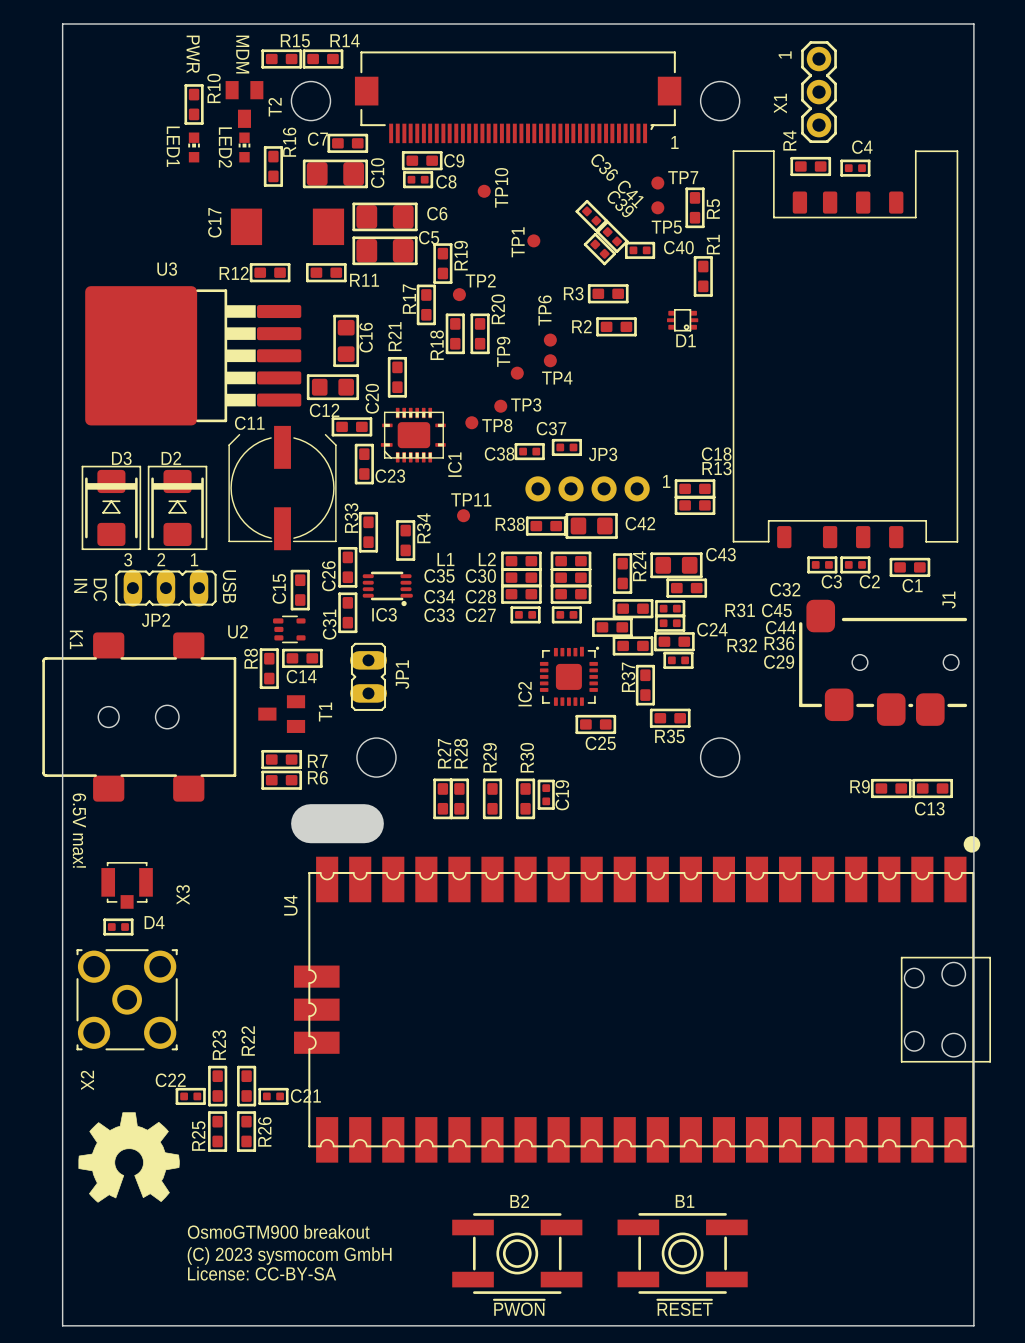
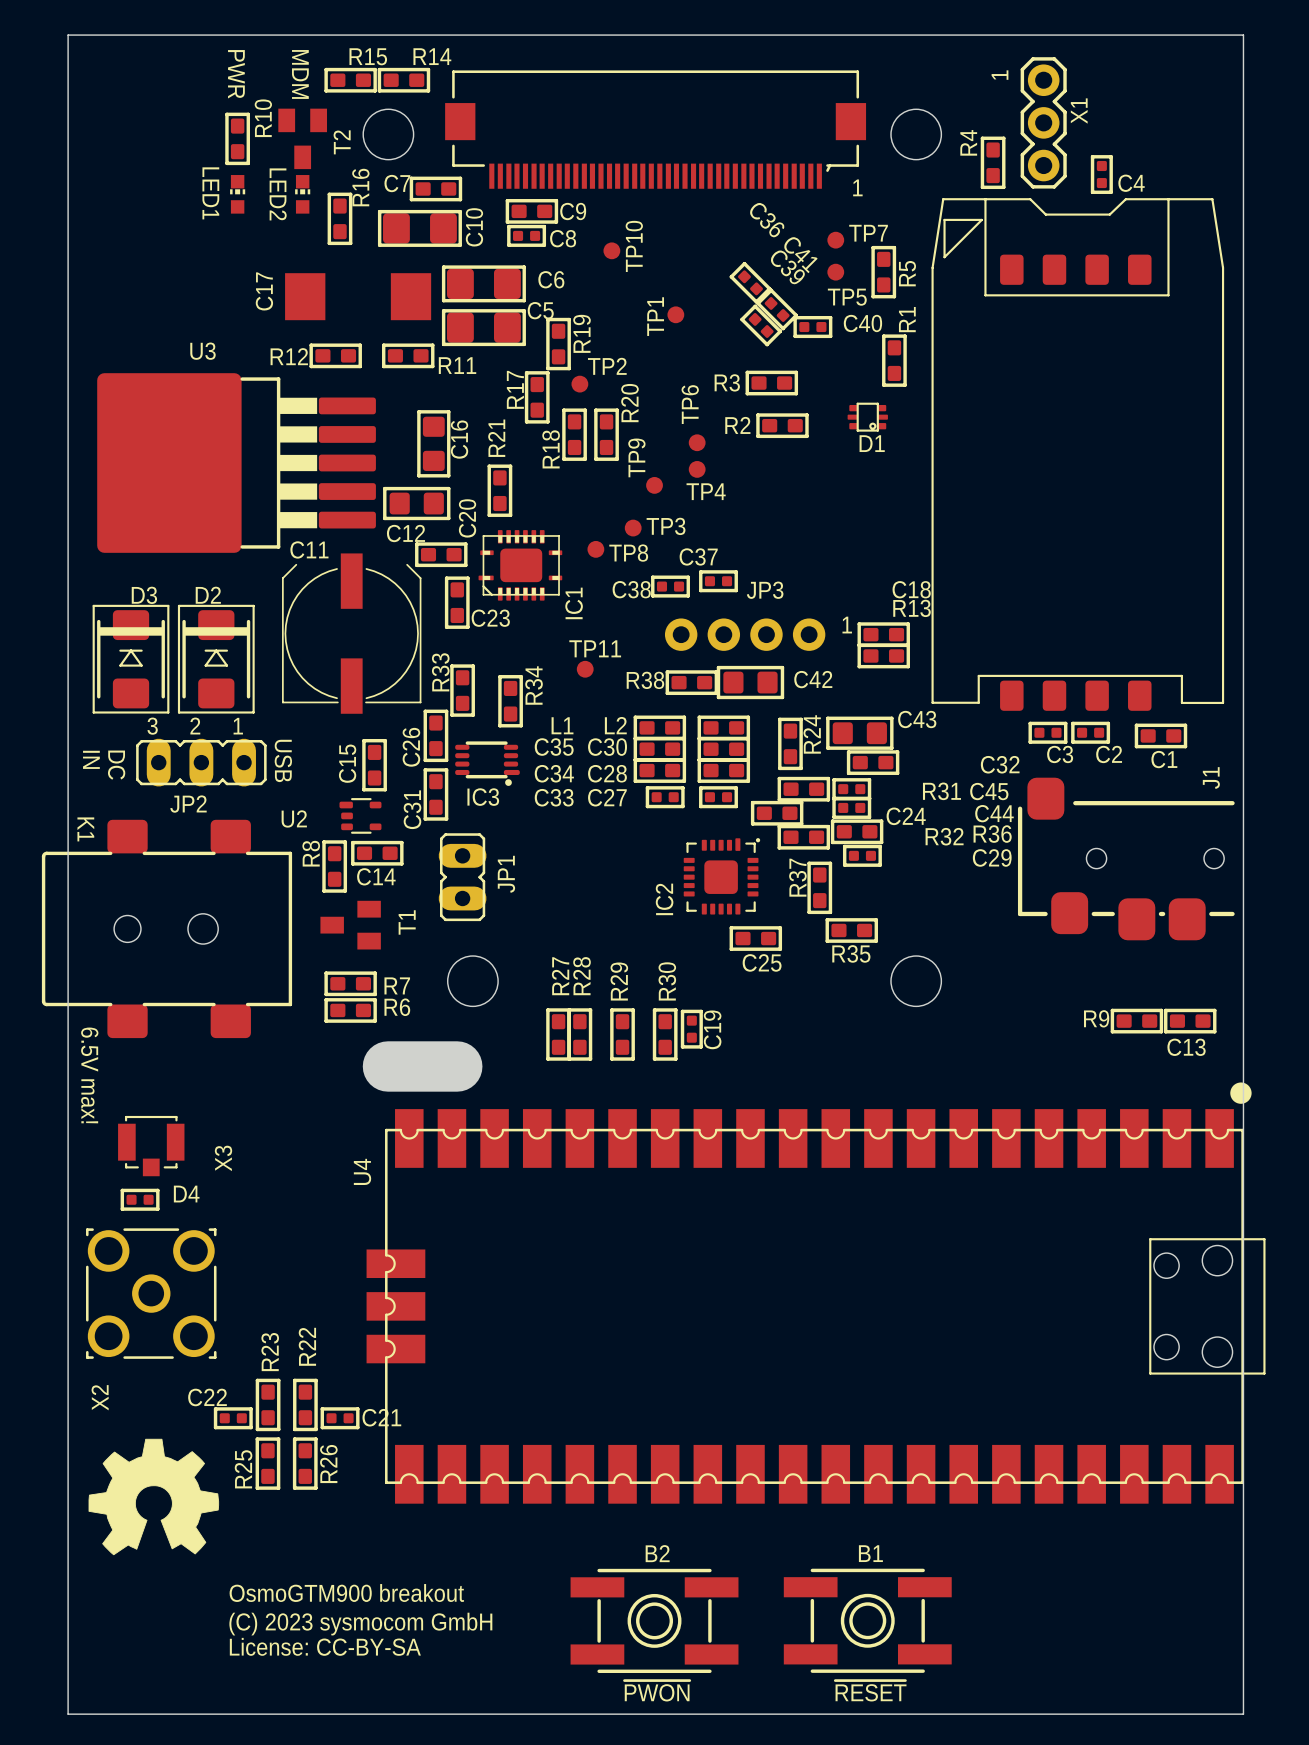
X1 name position: X1 (780, 103) -> X1 (1079, 111)
part footprint: [732, 150, 959, 549] -> [931, 197, 1225, 711]
R4 rotation: 0° (810, 166) -> 90° clockwise (993, 162)
R4 position: (810, 166) -> (993, 162)
C4 rotation: 0° (855, 168) -> 90° clockwise (1101, 174)
C4 position: (855, 168) -> (1101, 174)

